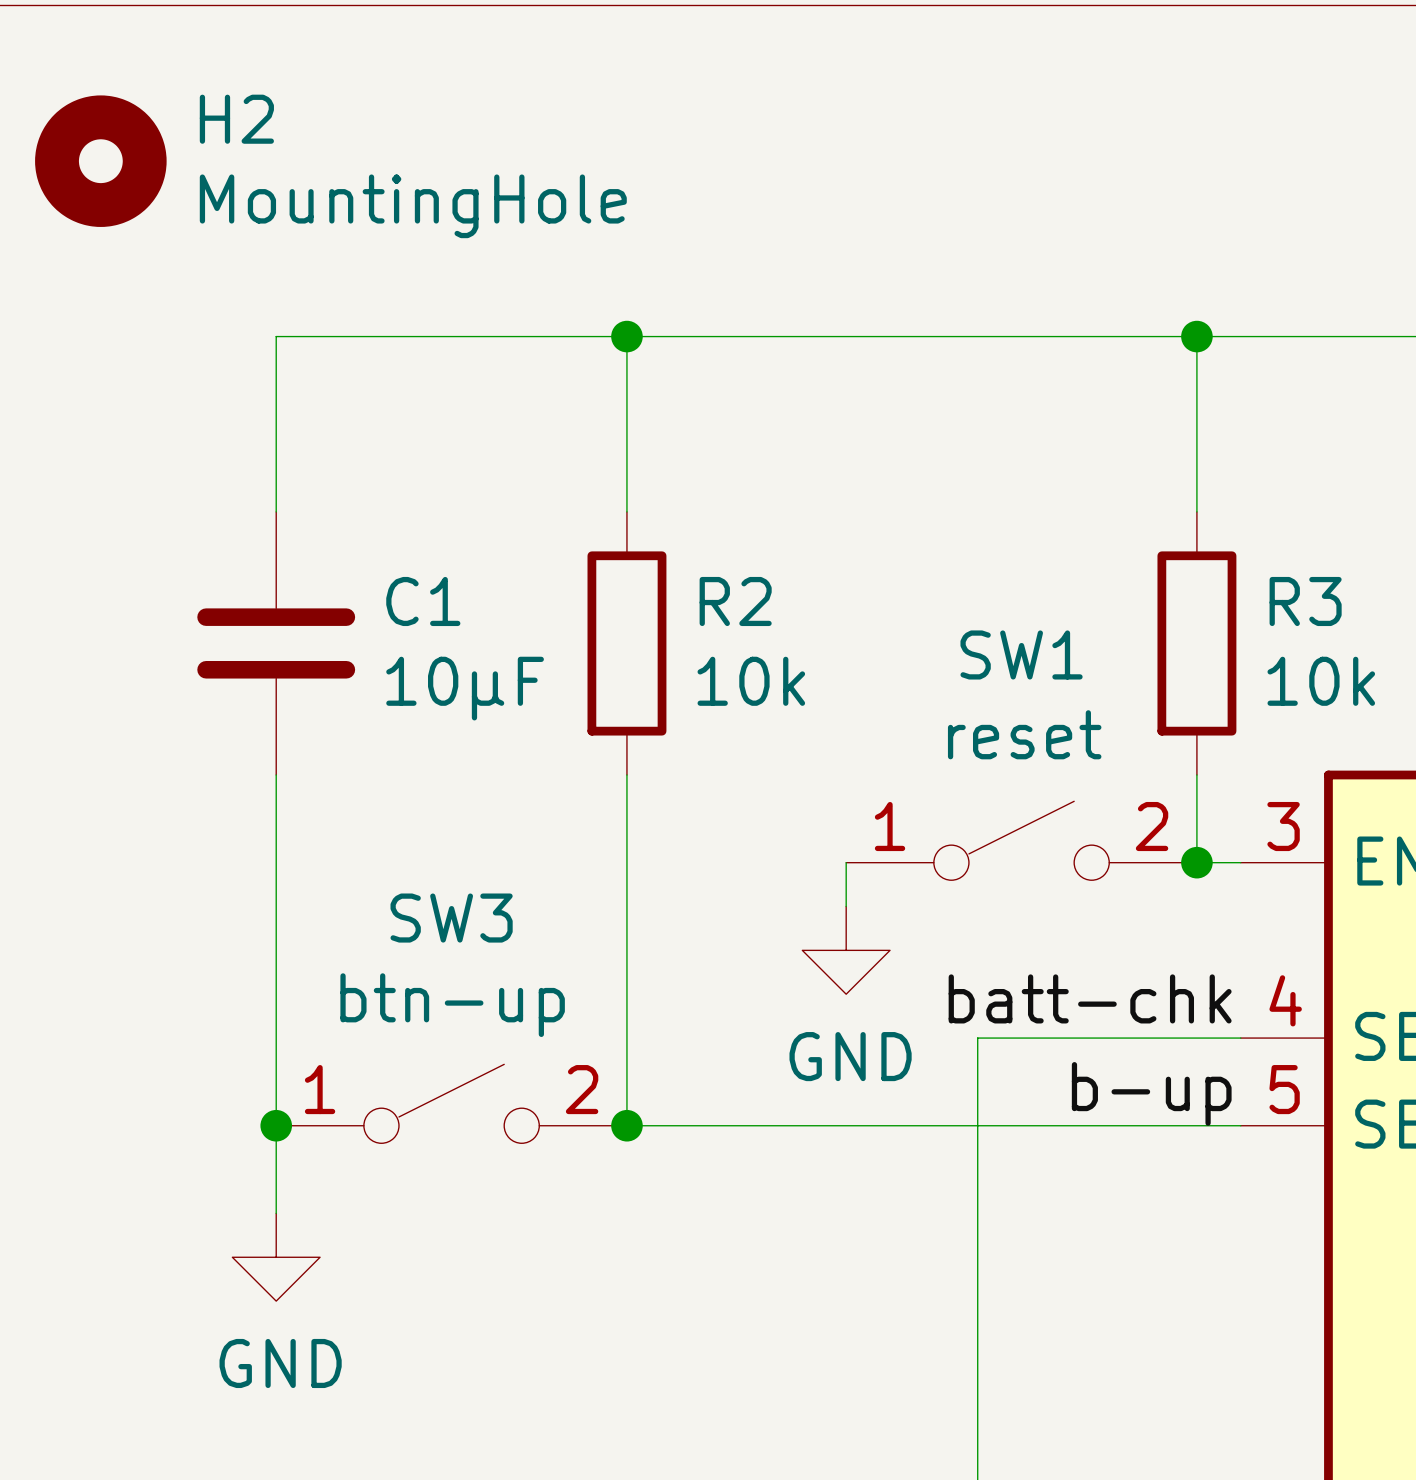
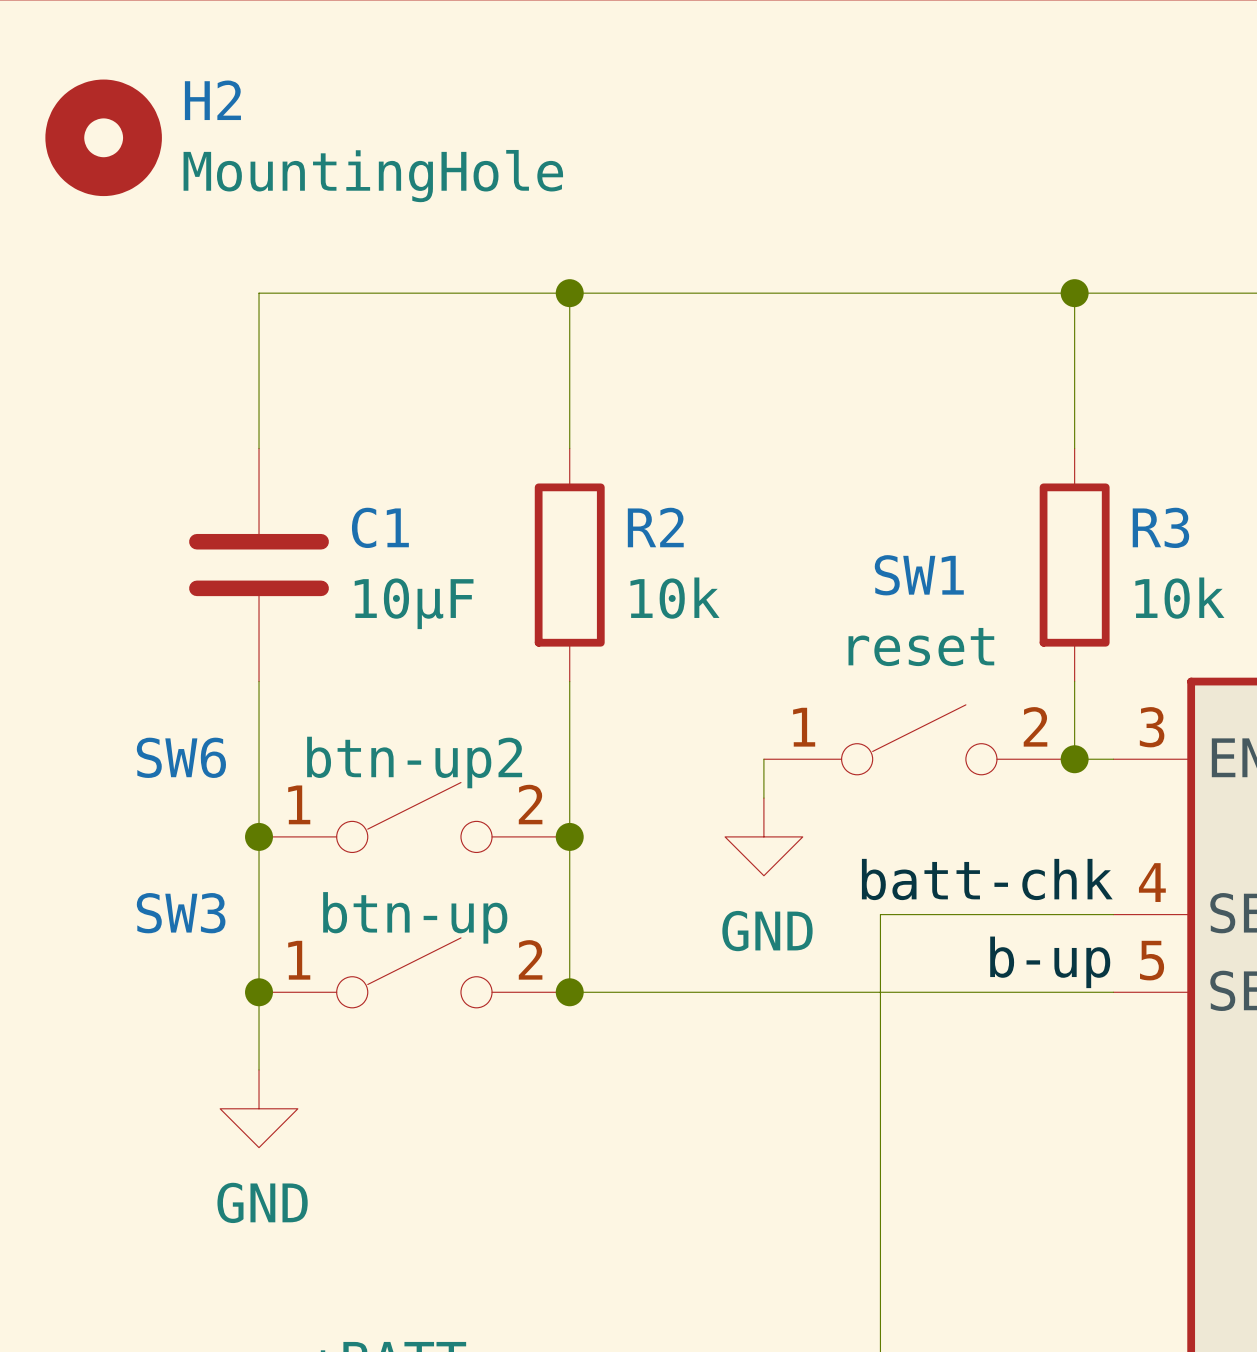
SW3 name position: SW3 (451, 918) -> SW3 (181, 913)
SW6: none -> btn-up2 (414, 817)
junction: none -> (259, 836)
junction: none -> (569, 836)
SW3 value position: btn-up (452, 1005) -> btn-up (415, 917)

